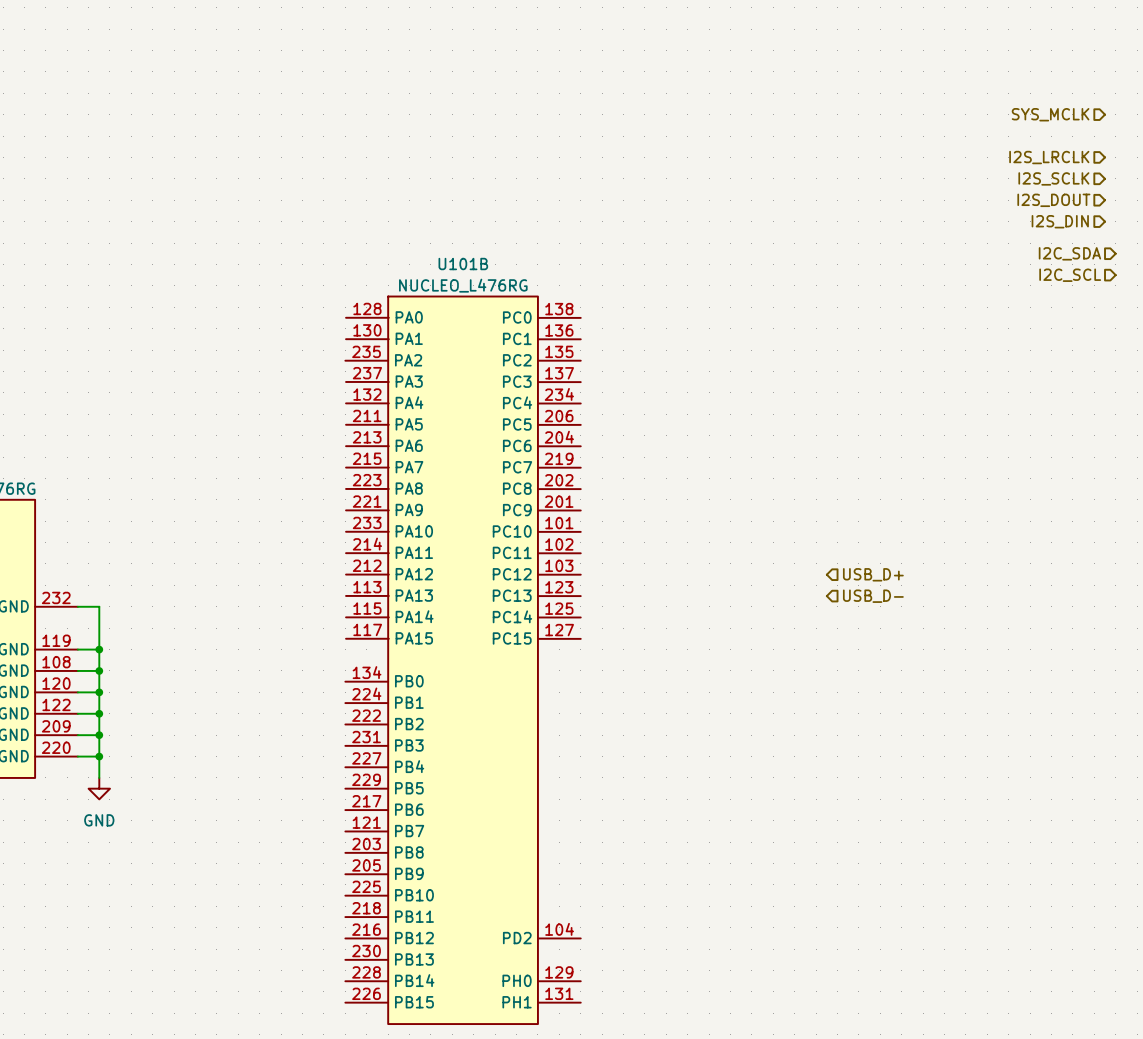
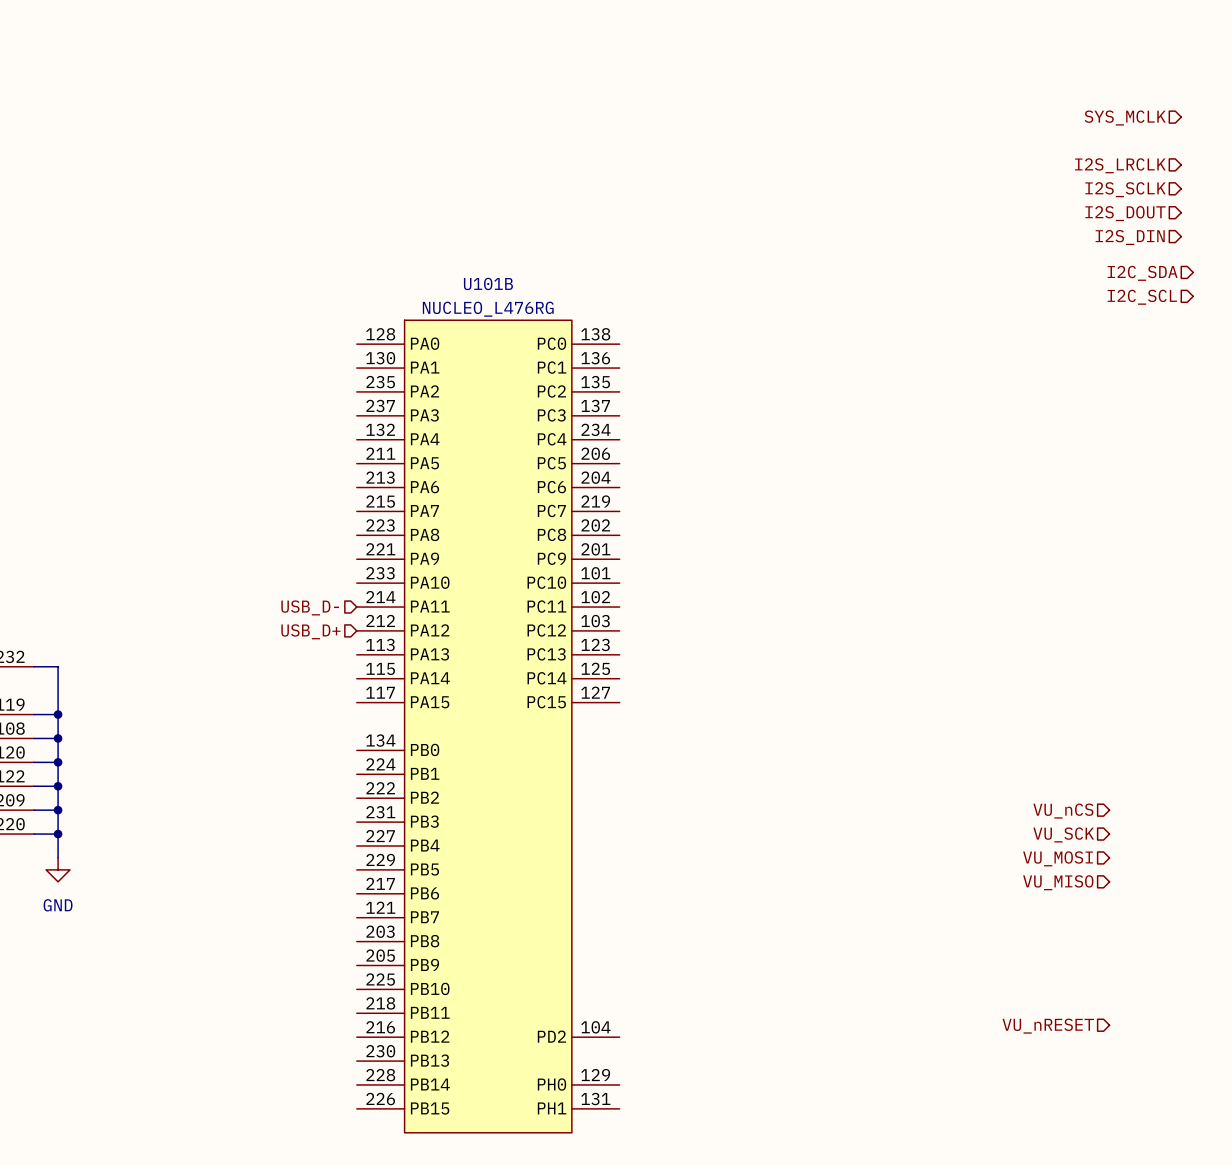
U101B symbol: [345, 296, 581, 1025] -> [356, 320, 620, 1133]
hierarchical label: none -> USB_D- (310, 607)
hierarchical label: none -> USB_D+ (310, 631)
hierarchical label: USB_D+ (873, 574) -> none
hierarchical label: USB_D- (873, 596) -> none
hierarchical label: none -> VU_nCS (1063, 811)
hierarchical label: none -> VU_SCK (1063, 834)
hierarchical label: none -> VU_MOSI (1058, 858)
hierarchical label: none -> VU_MISO (1058, 882)
hierarchical label: none -> VU_nRESET (1048, 1026)

